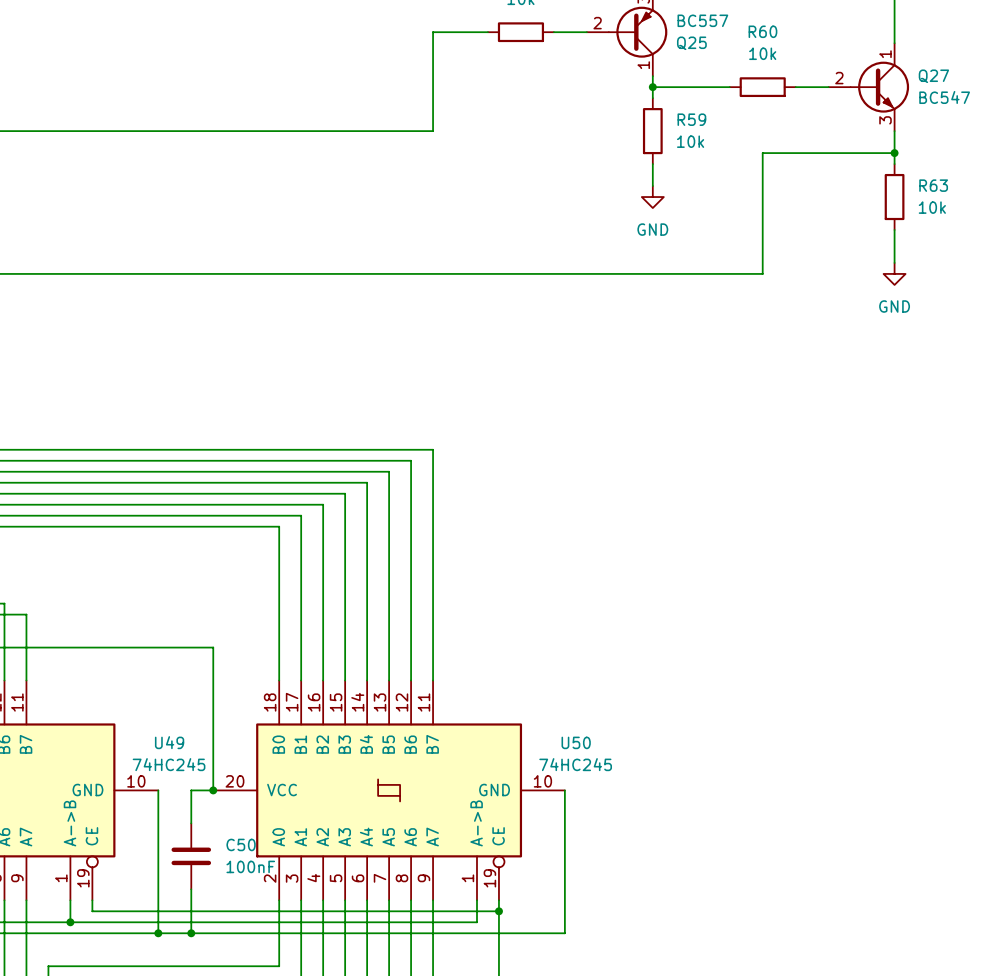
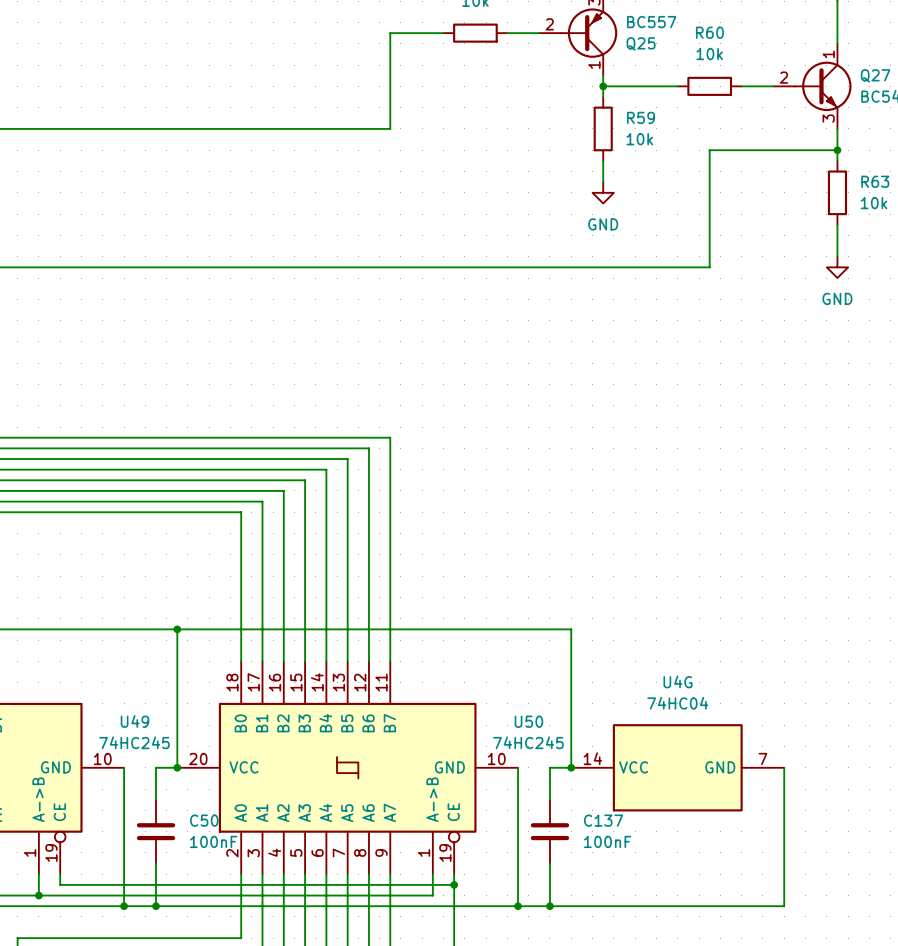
wire: none -> (177, 629) (571, 629) (571, 767) (549, 767) (549, 799)
junction: none -> (177, 629)
junction: none -> (571, 767)
U4G: none -> 74HC04 (677, 767)
wire: none -> (784, 767) (784, 906) (518, 906)
C137: none -> 100nF (549, 831)
wire: none -> (549, 863) (549, 906)
junction: none -> (518, 906)
junction: none -> (549, 906)

